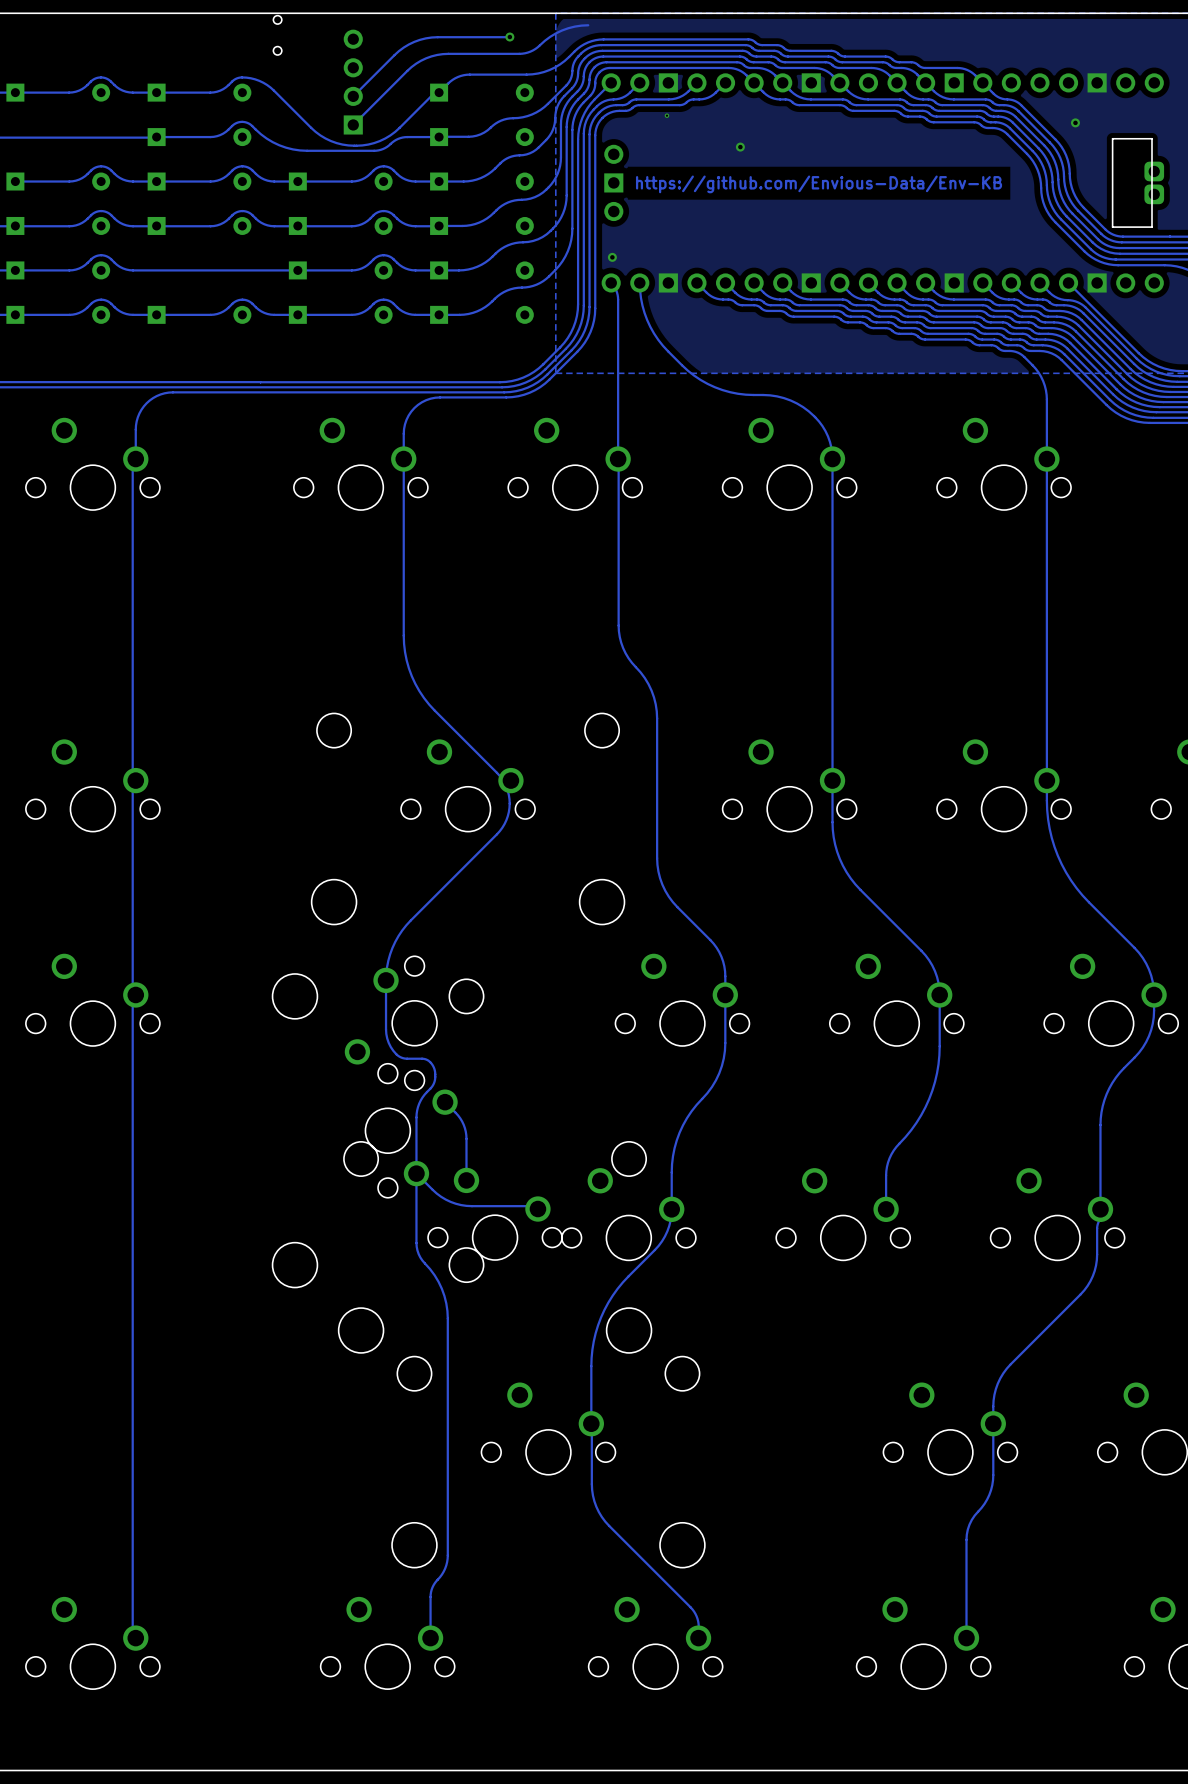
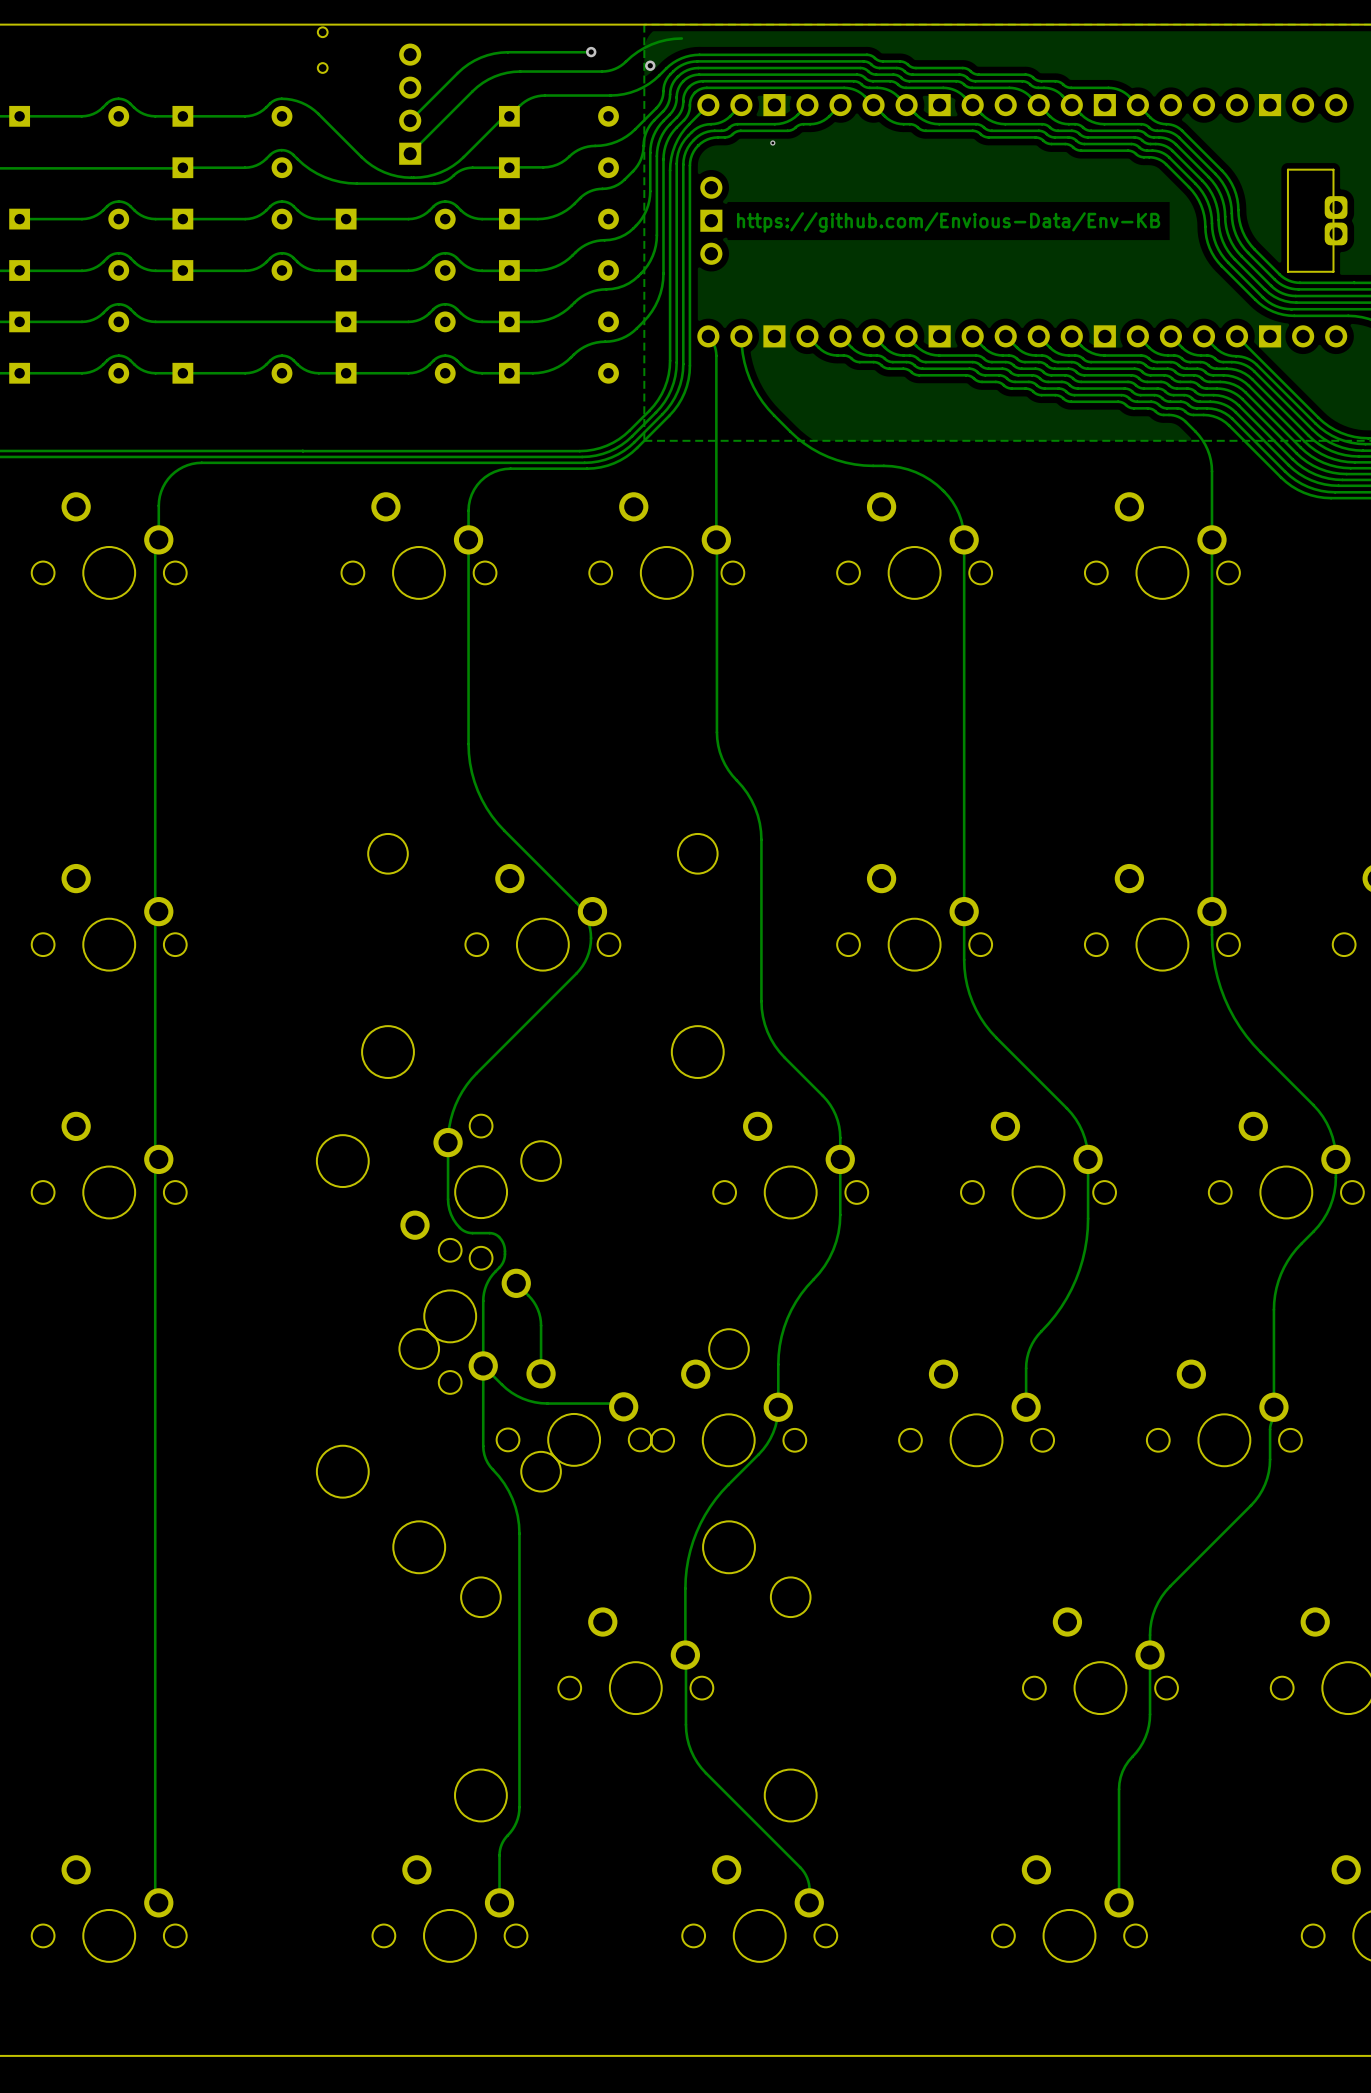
via: none -> (650, 65)
via: (1075, 122) -> none
via: (740, 147) -> none
via: (612, 257) -> none

